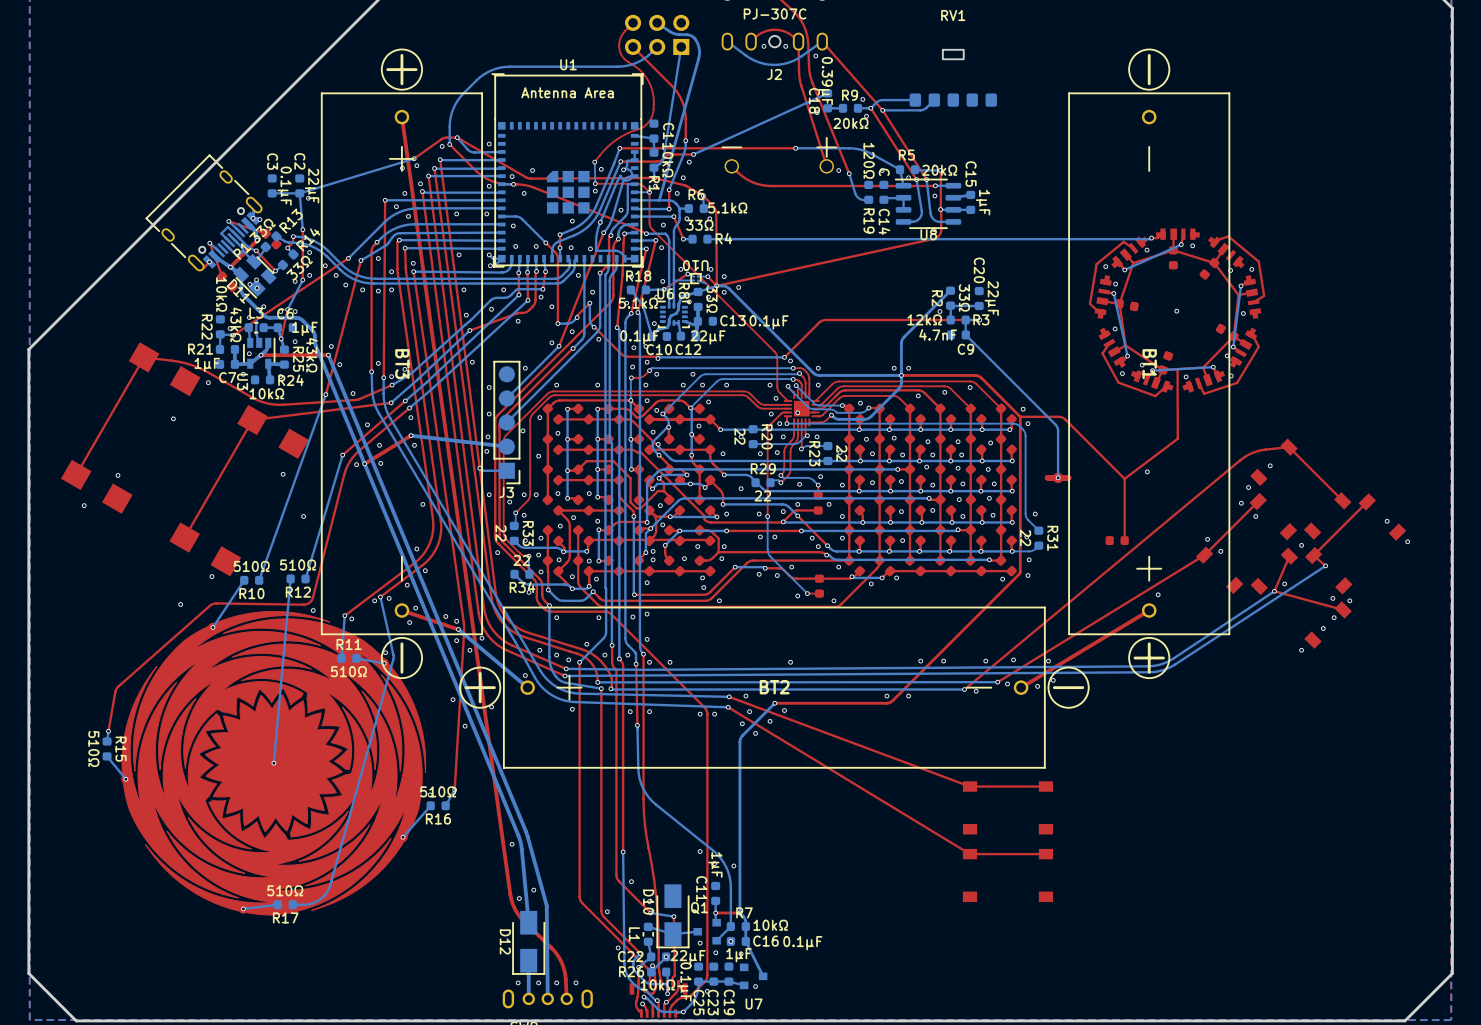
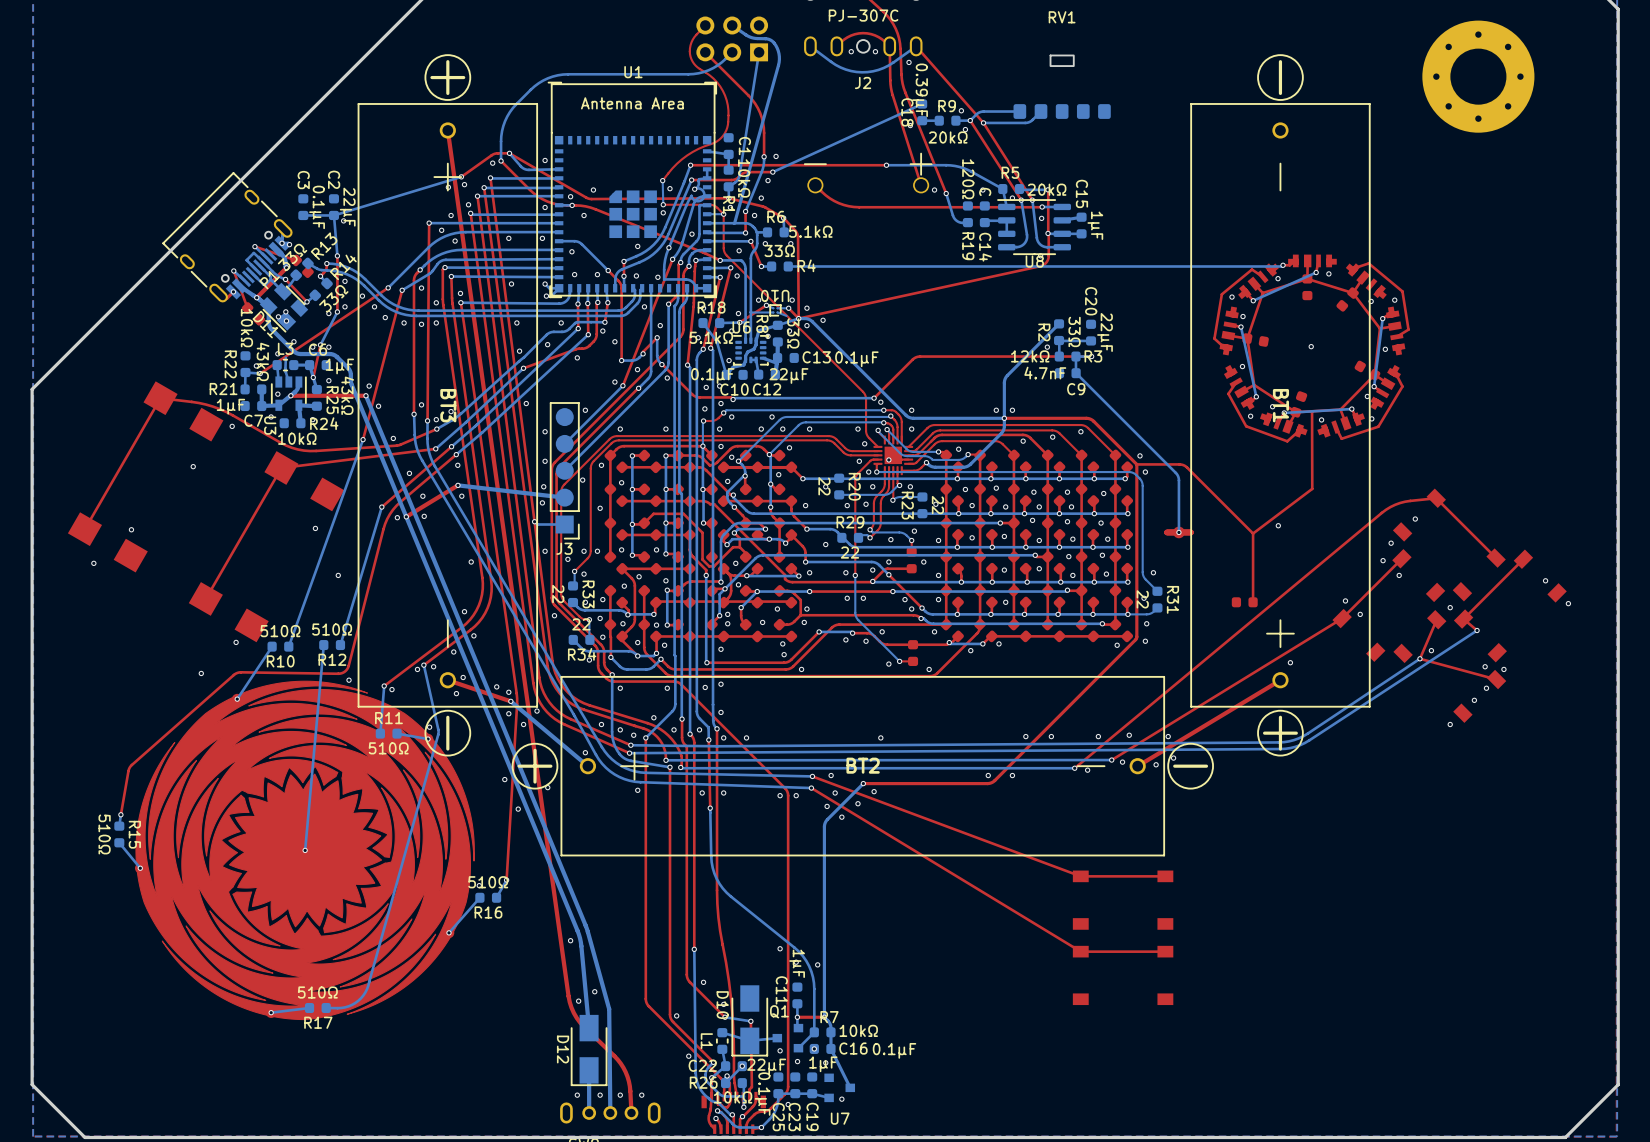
part: none -> (1478, 76)

